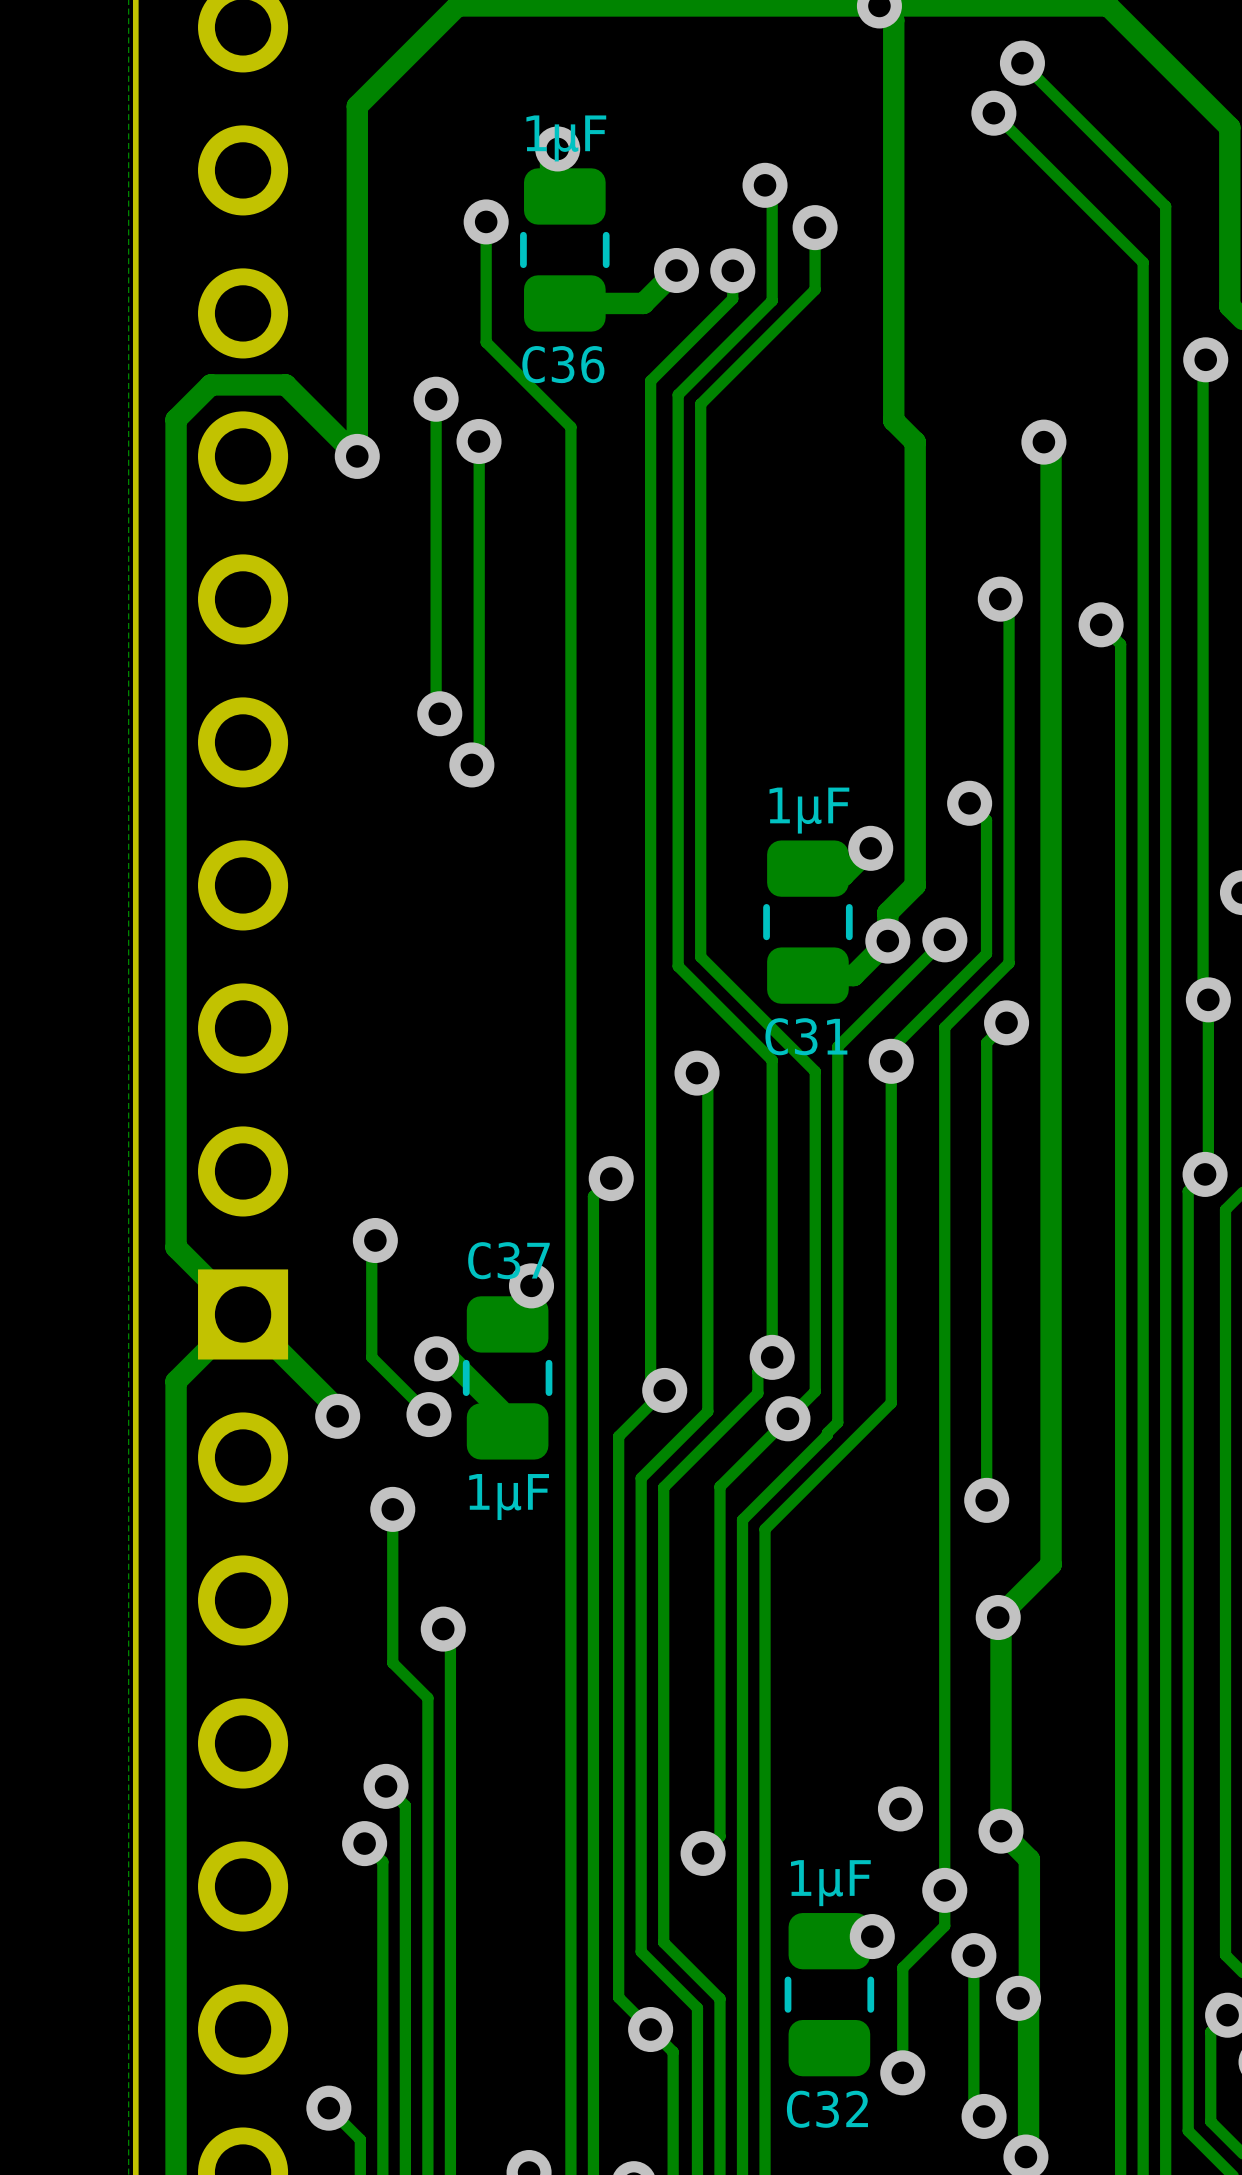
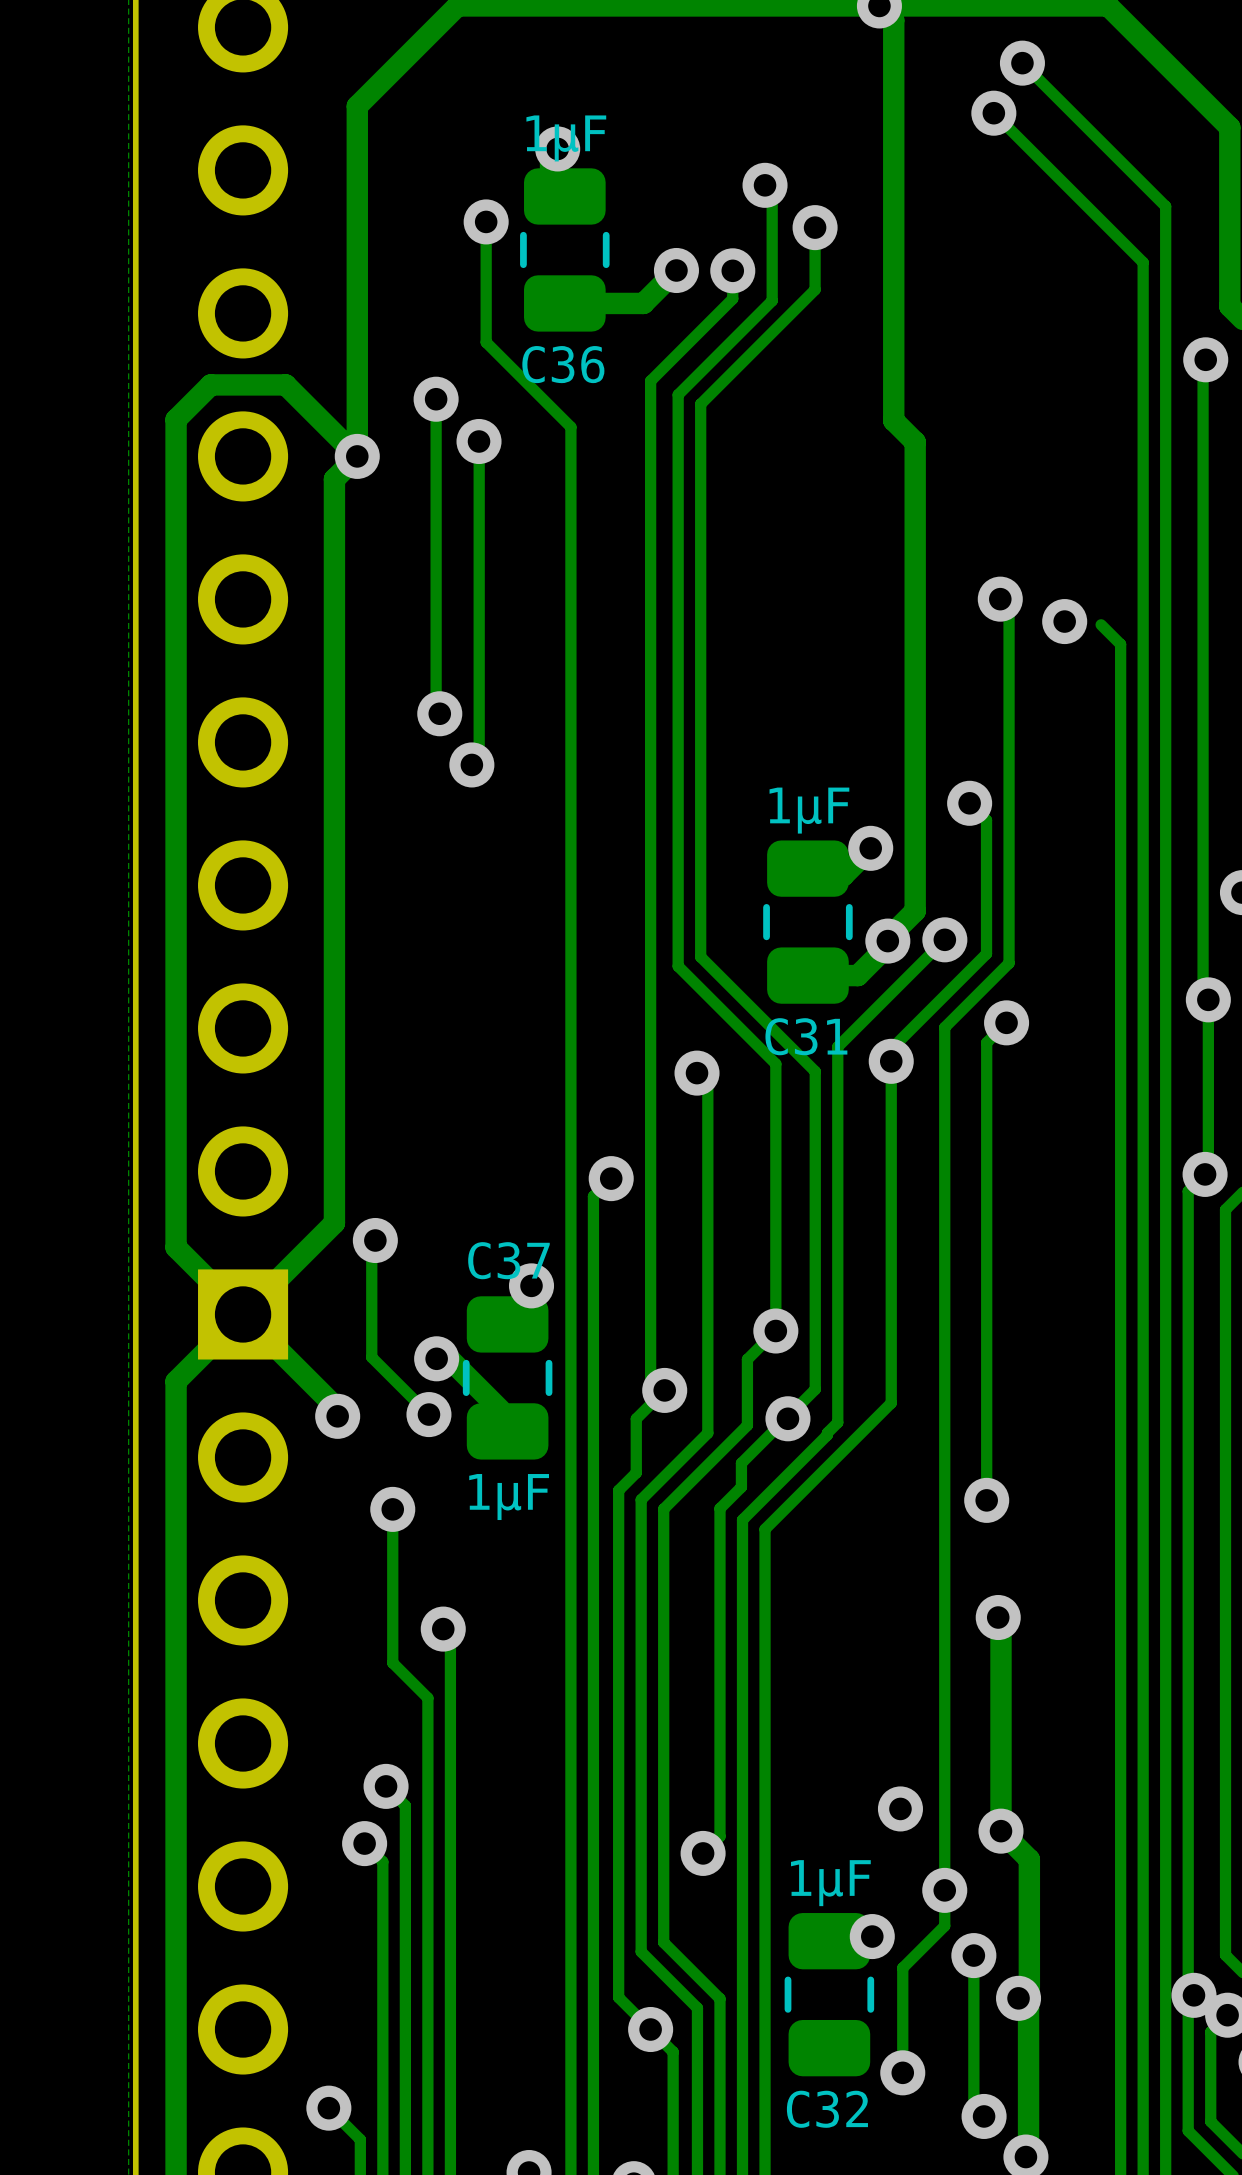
track: (1043, 442) (1051, 449) (1051, 1564) (998, 1617) -> none
via: (1043, 442) -> none
track: none -> (357, 456) (334, 479) (334, 1223) (243, 1314)
via position: (1101, 624) -> (1064, 621)
track: (915, 885) (887, 912) (887, 941) (853, 975) -> (915, 885) (915, 911) (890, 935) (890, 942) (857, 975) (853, 975)
track: (772, 1060) (772, 1357) (757, 1371) (757, 1393) (663, 1487) (663, 1509) -> (772, 1060) (775, 1063) (775, 1331) (747, 1359) (747, 1425) (663, 1509)
via position: (772, 1357) -> (775, 1331)
track: (815, 1389) (719, 1486) (719, 1508) -> (815, 1389) (741, 1463) (741, 1487) (719, 1508)
track: (707, 1411) (641, 1478) (641, 1499) -> (707, 1411) (707, 1433) (641, 1499)
track: (636, 1418) (618, 1436) (618, 1490) -> (636, 1418) (636, 1472) (618, 1490)
via: none -> (1193, 1995)

